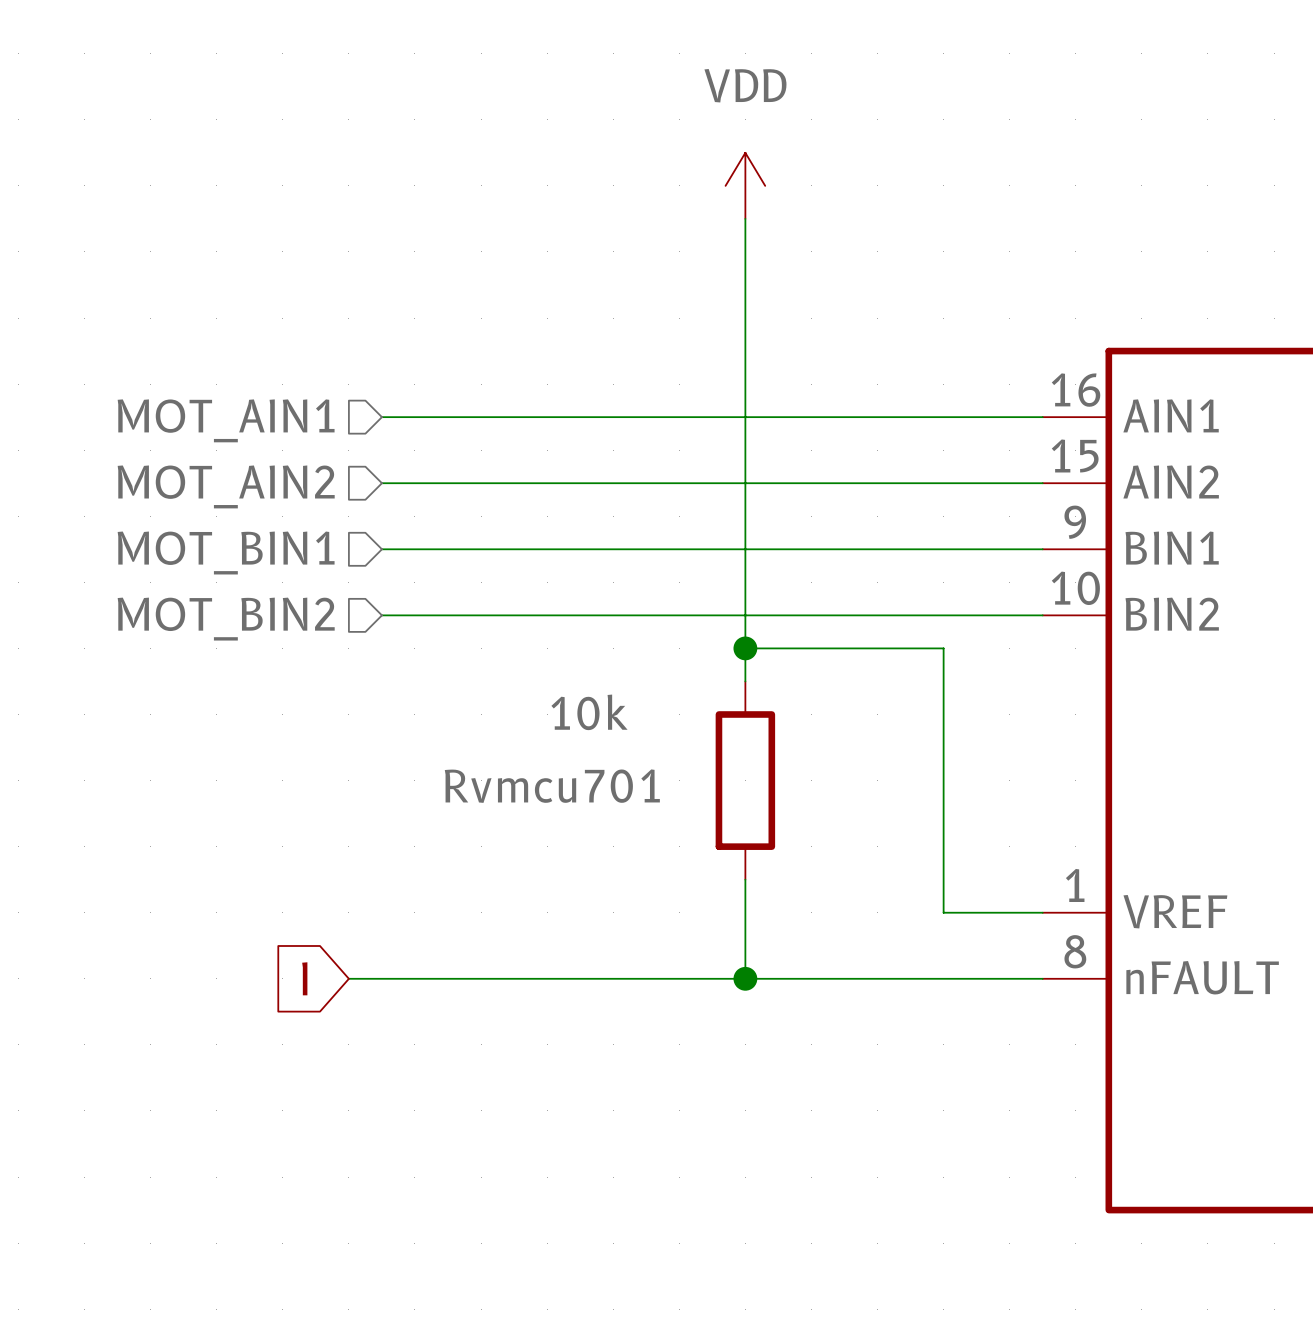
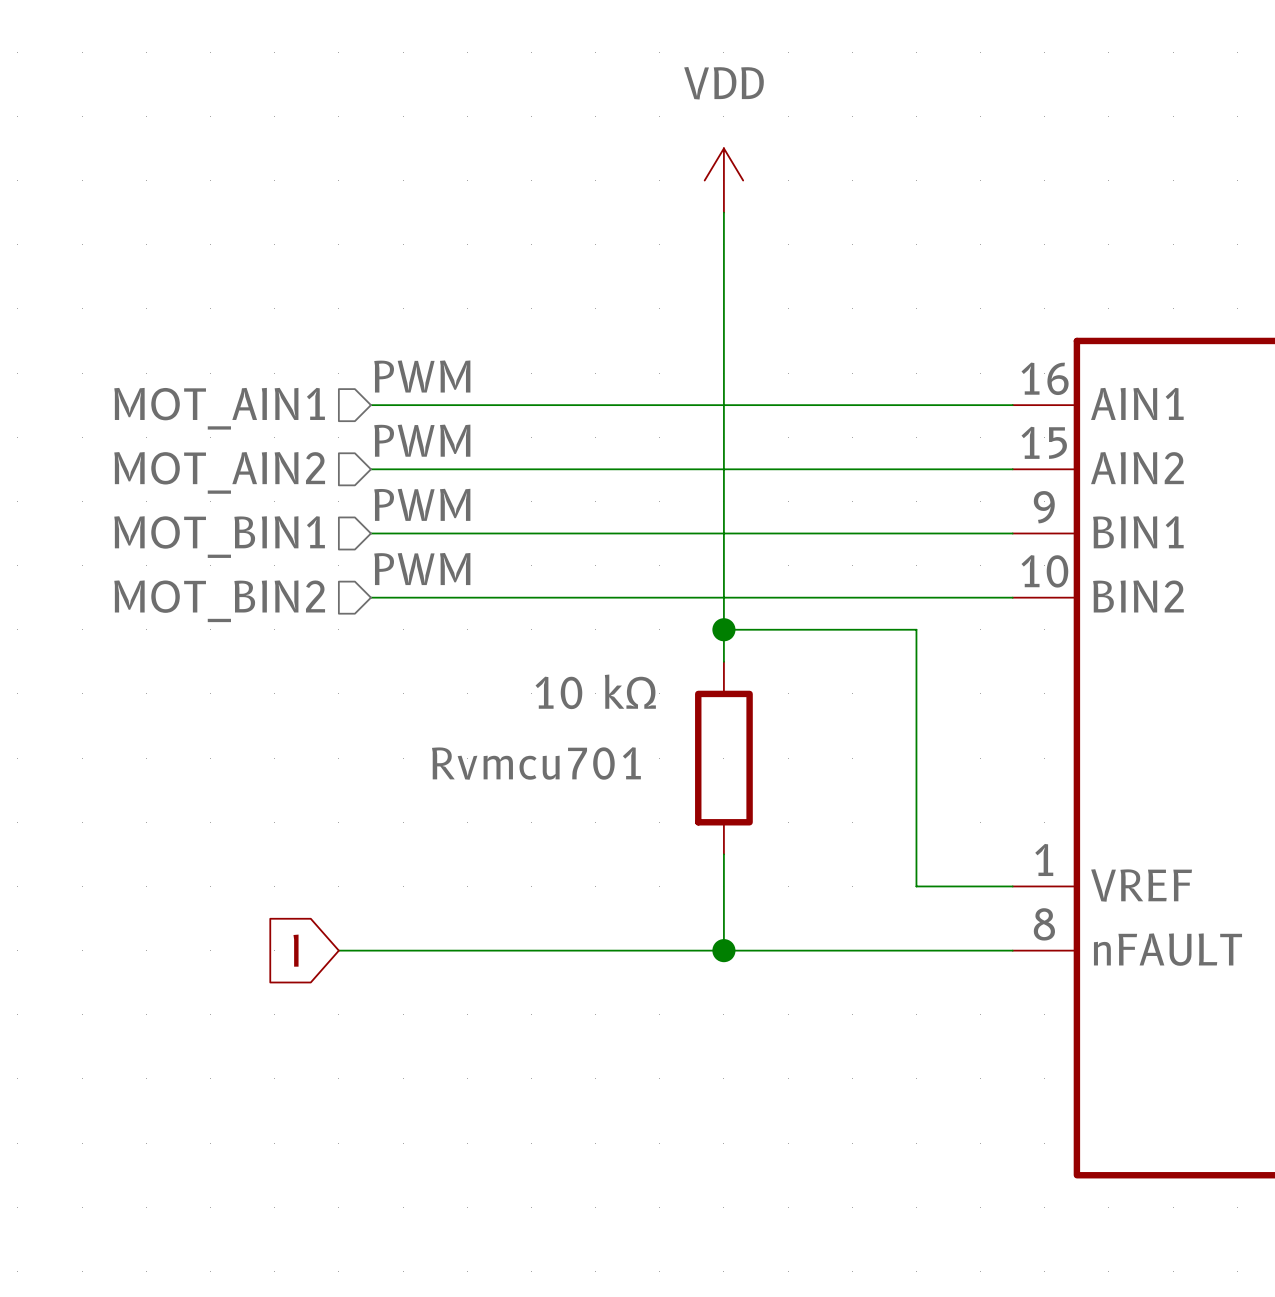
label: none -> PWM (422, 376)
label: none -> PWM (422, 440)
label: none -> PWM (422, 504)
label: none -> PWM (422, 569)
Rvmcu701 value: 10k (589, 712) -> 10 kΩ (595, 691)

